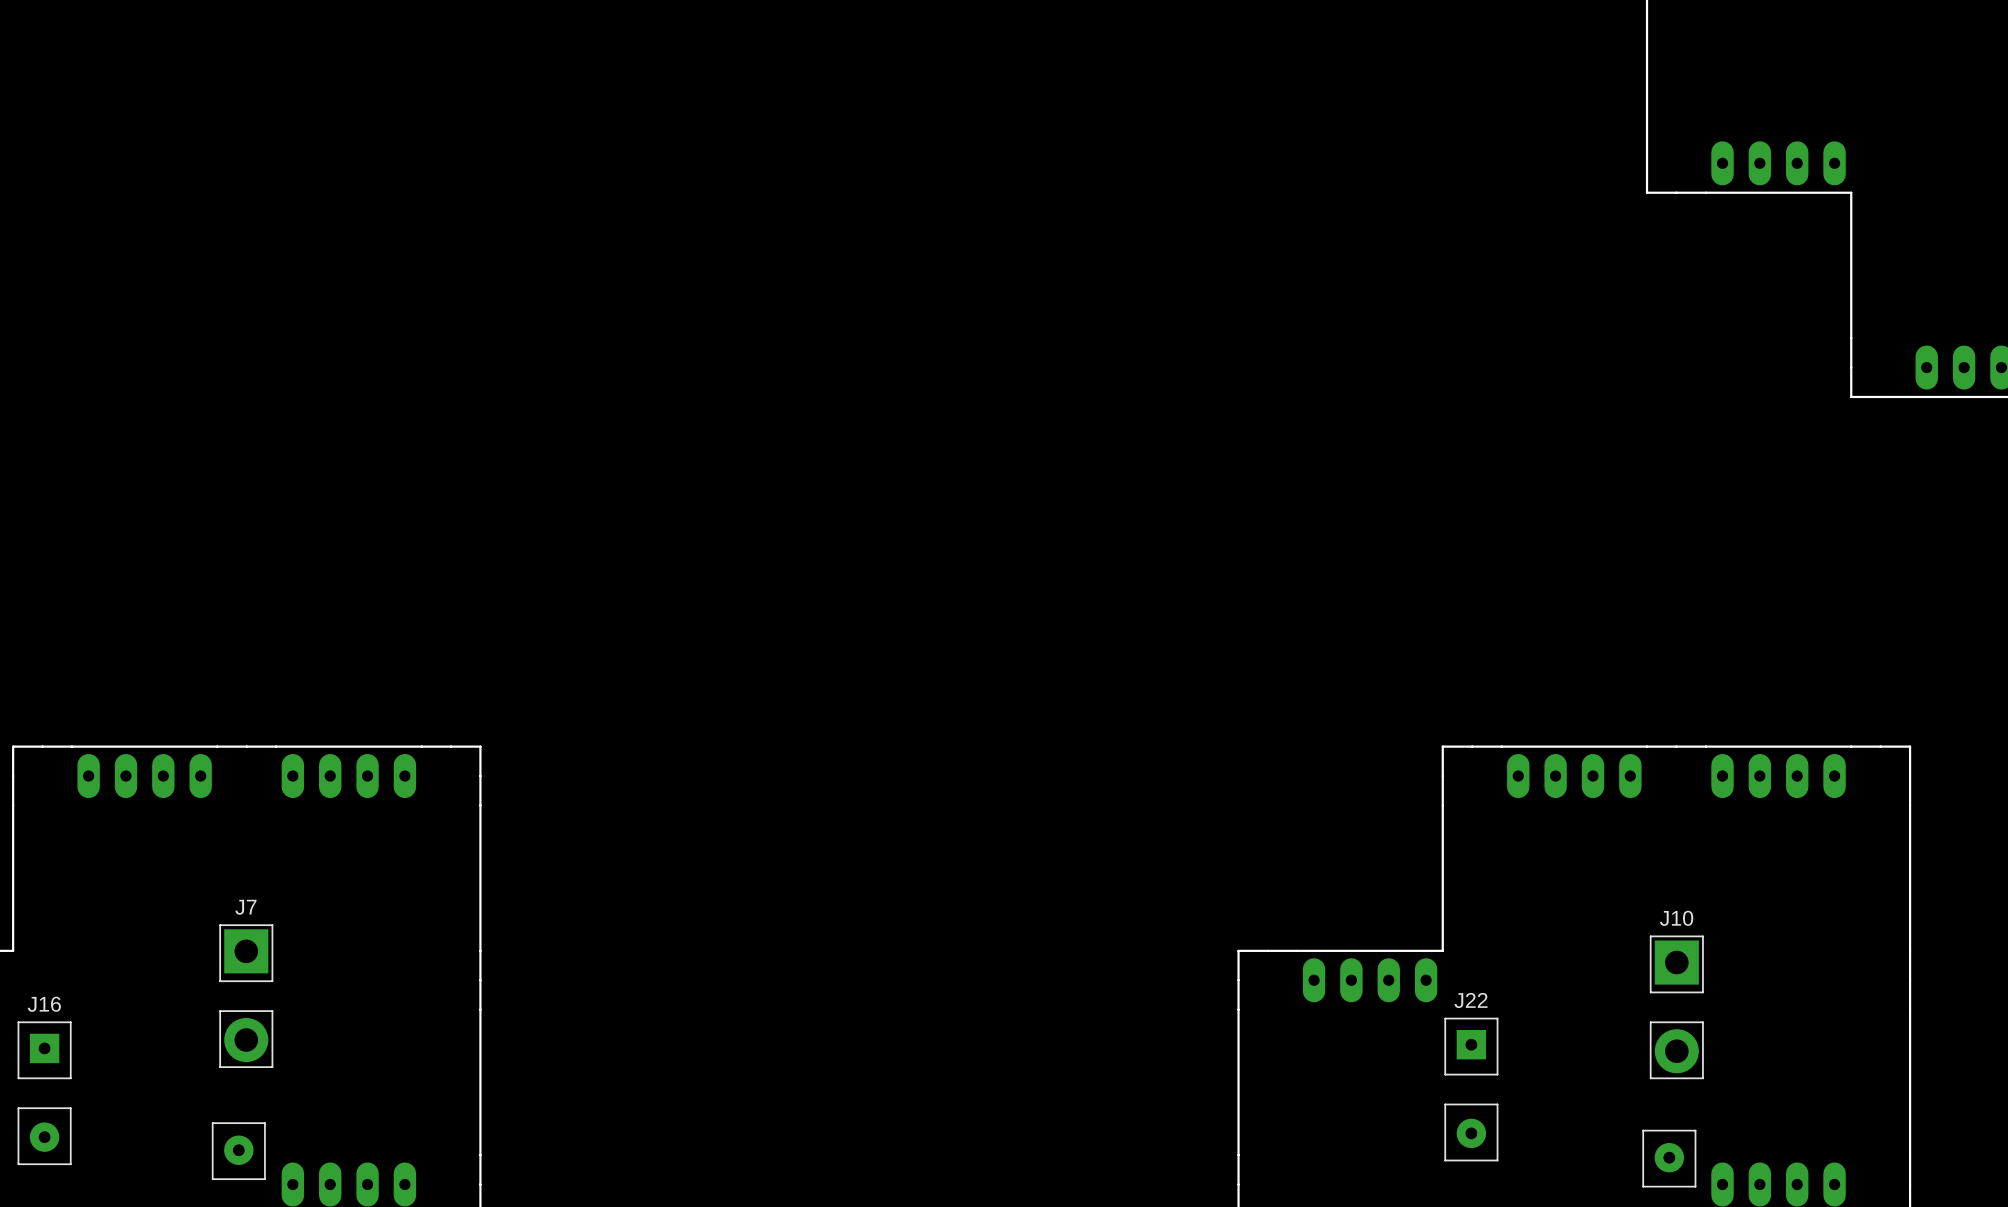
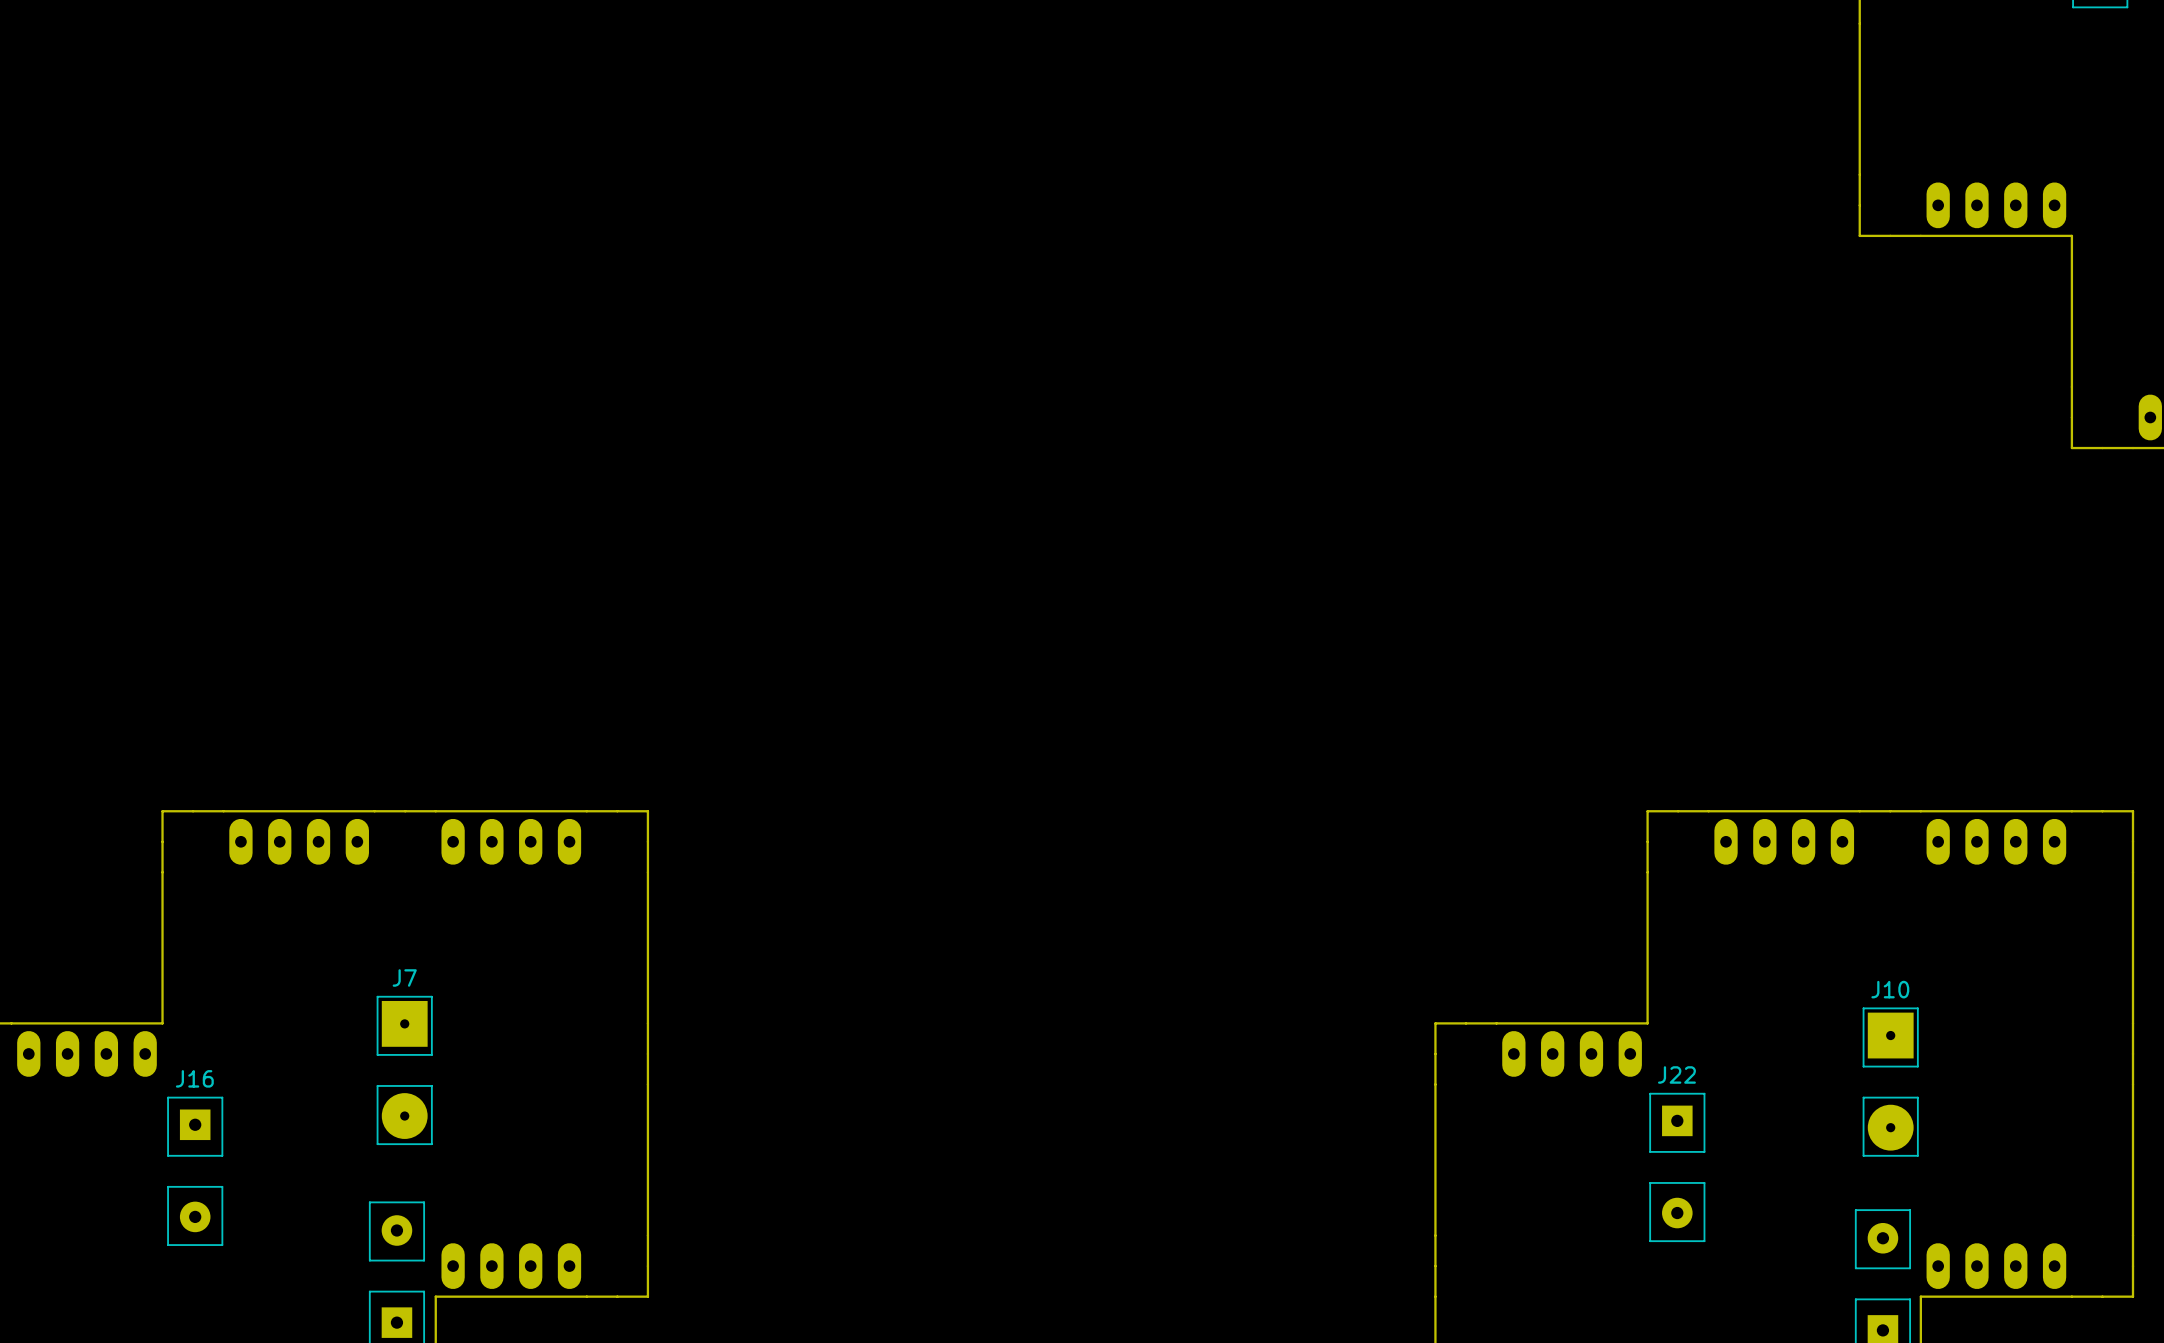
J7 footprint: [219, 924, 274, 1069] -> [376, 995, 433, 1146]
J10 footprint: [1649, 935, 1704, 1080] -> [1862, 1007, 1919, 1157]

